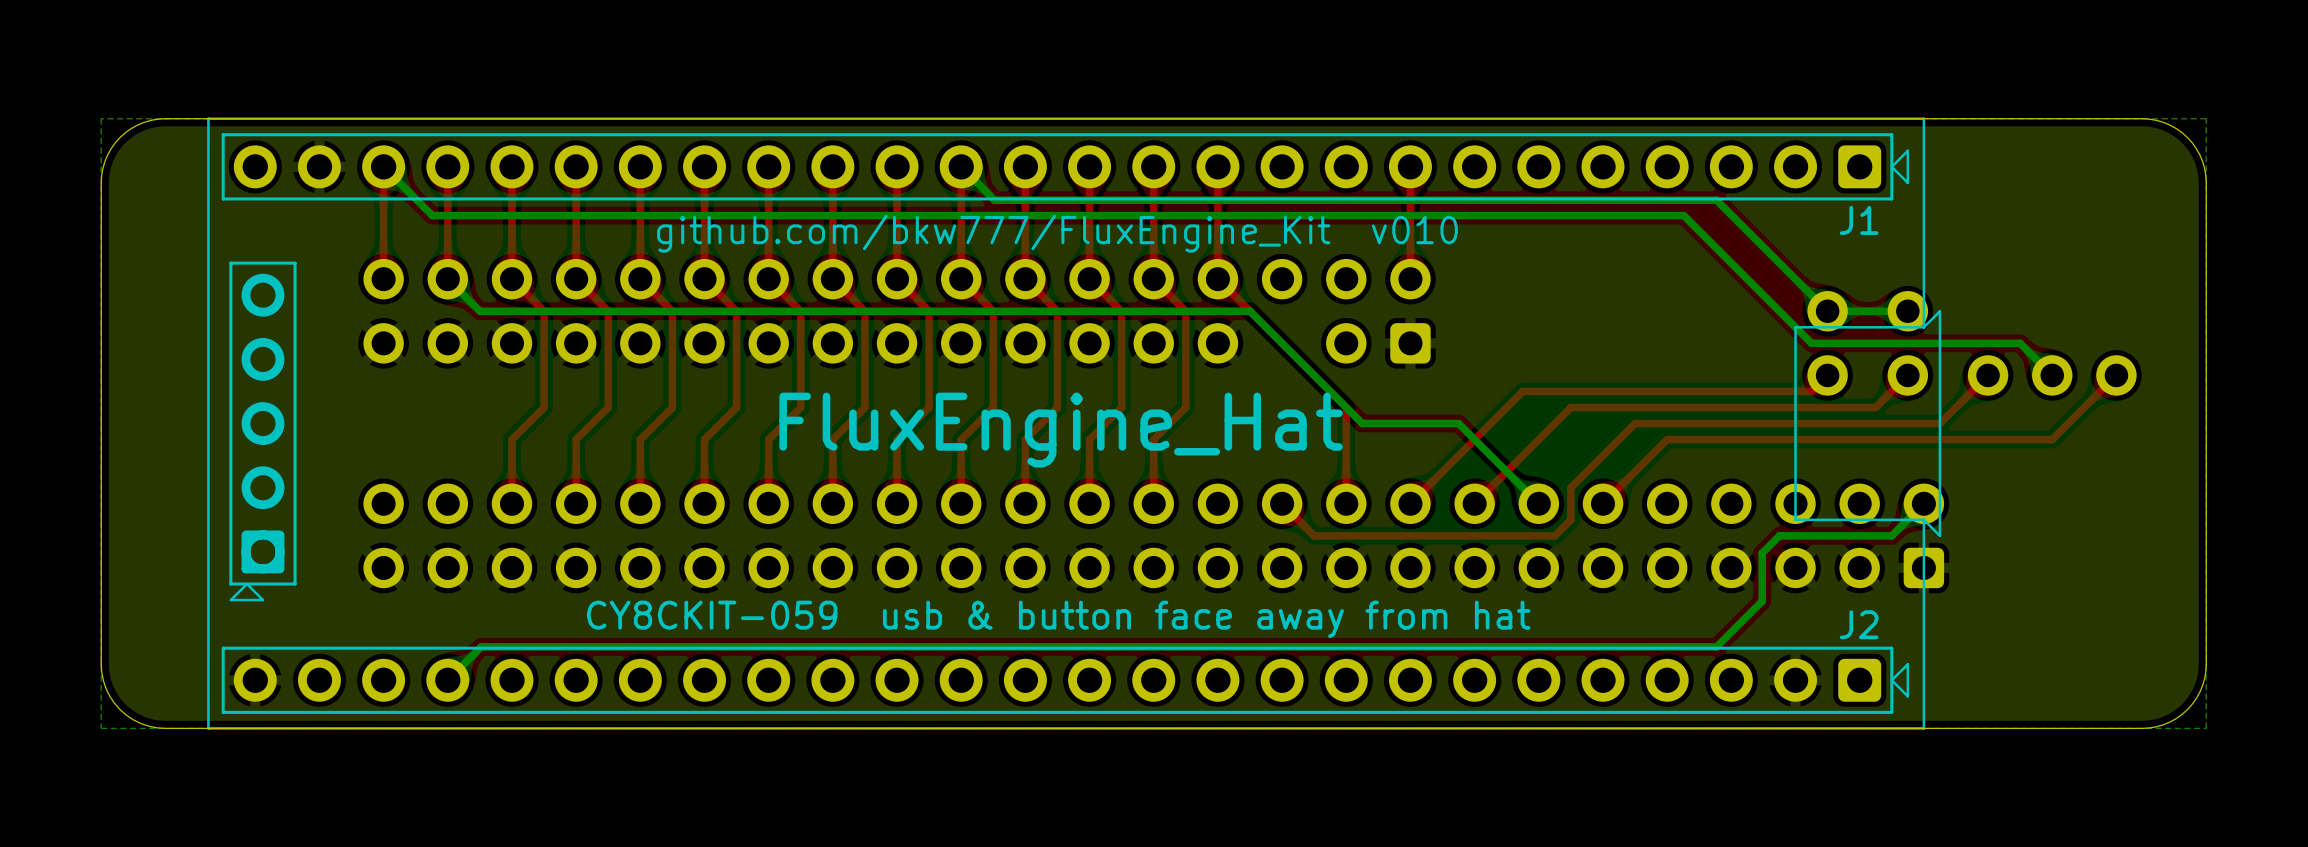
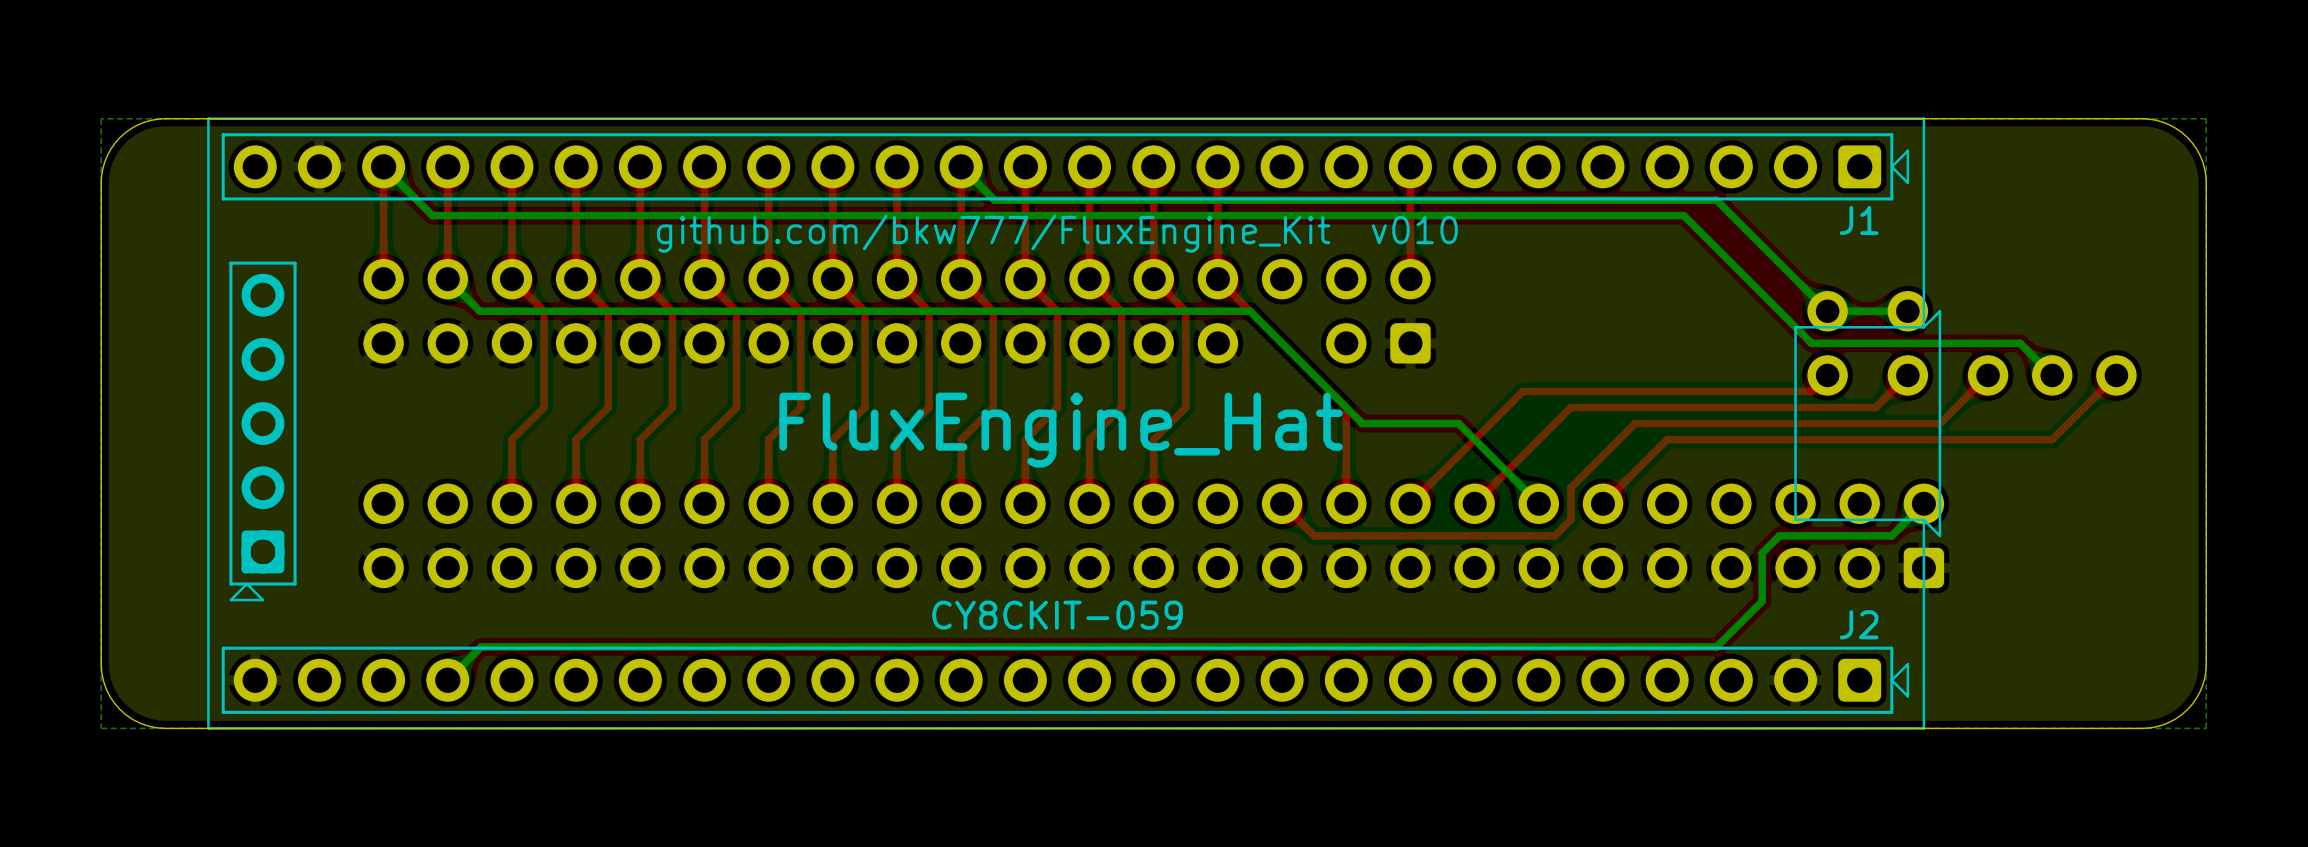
part value: CY8CKIT-059 usb & button face away from hat (1058, 619) -> CY8CKIT-059 (1057, 615)

